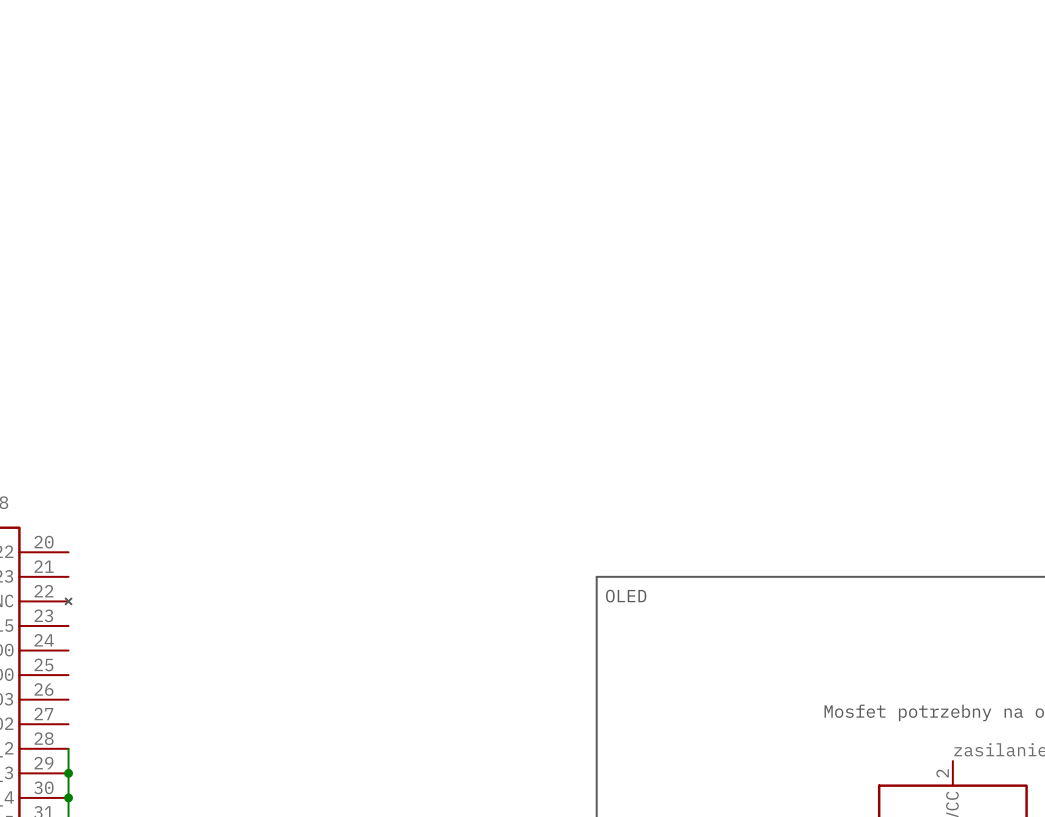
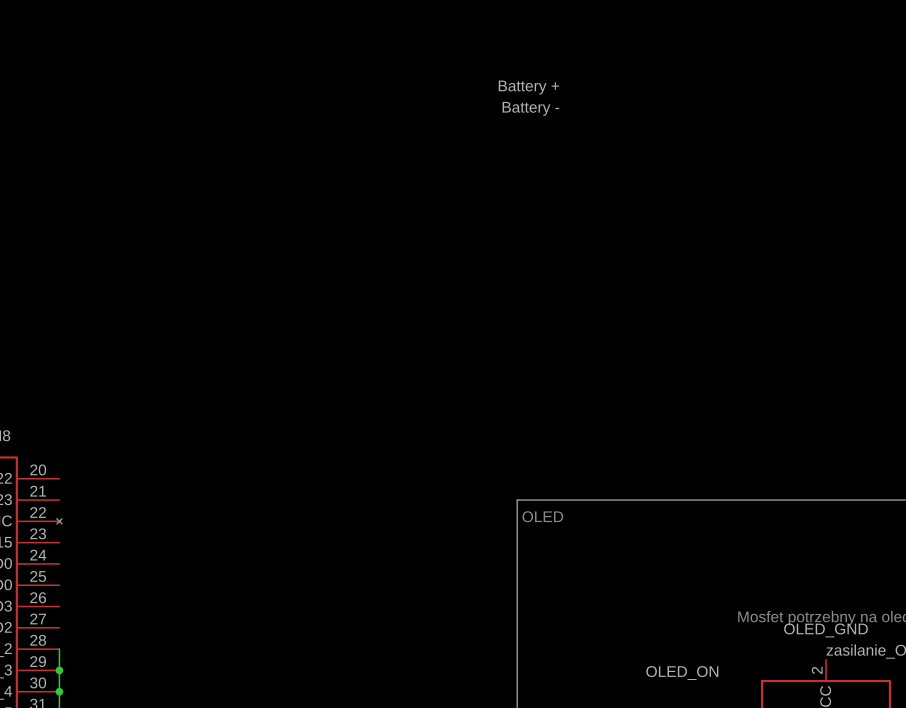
label: none -> Battery + (528, 87)
label: none -> Battery - (530, 108)
label: none -> OLED_GND (826, 630)
label: none -> OLED_ON (682, 673)

